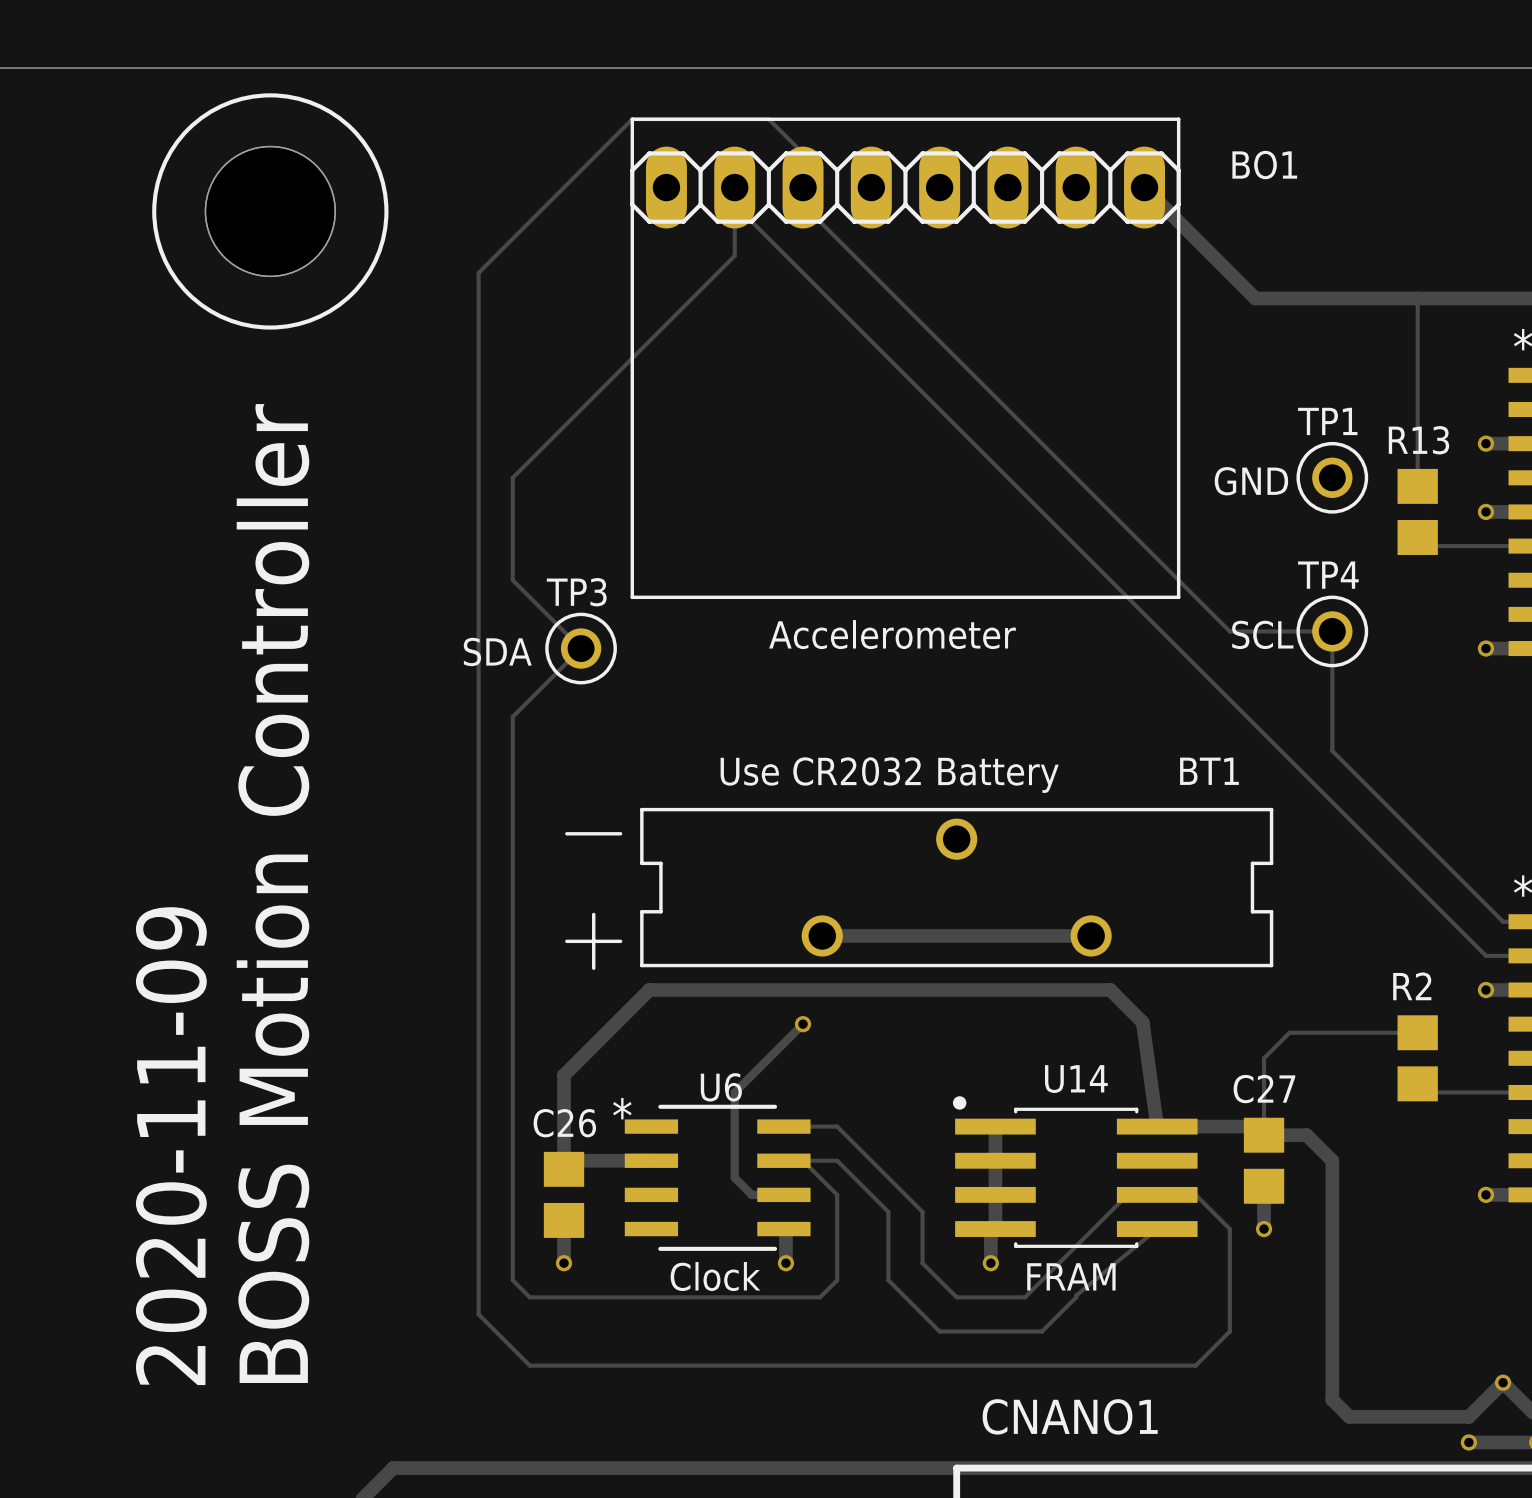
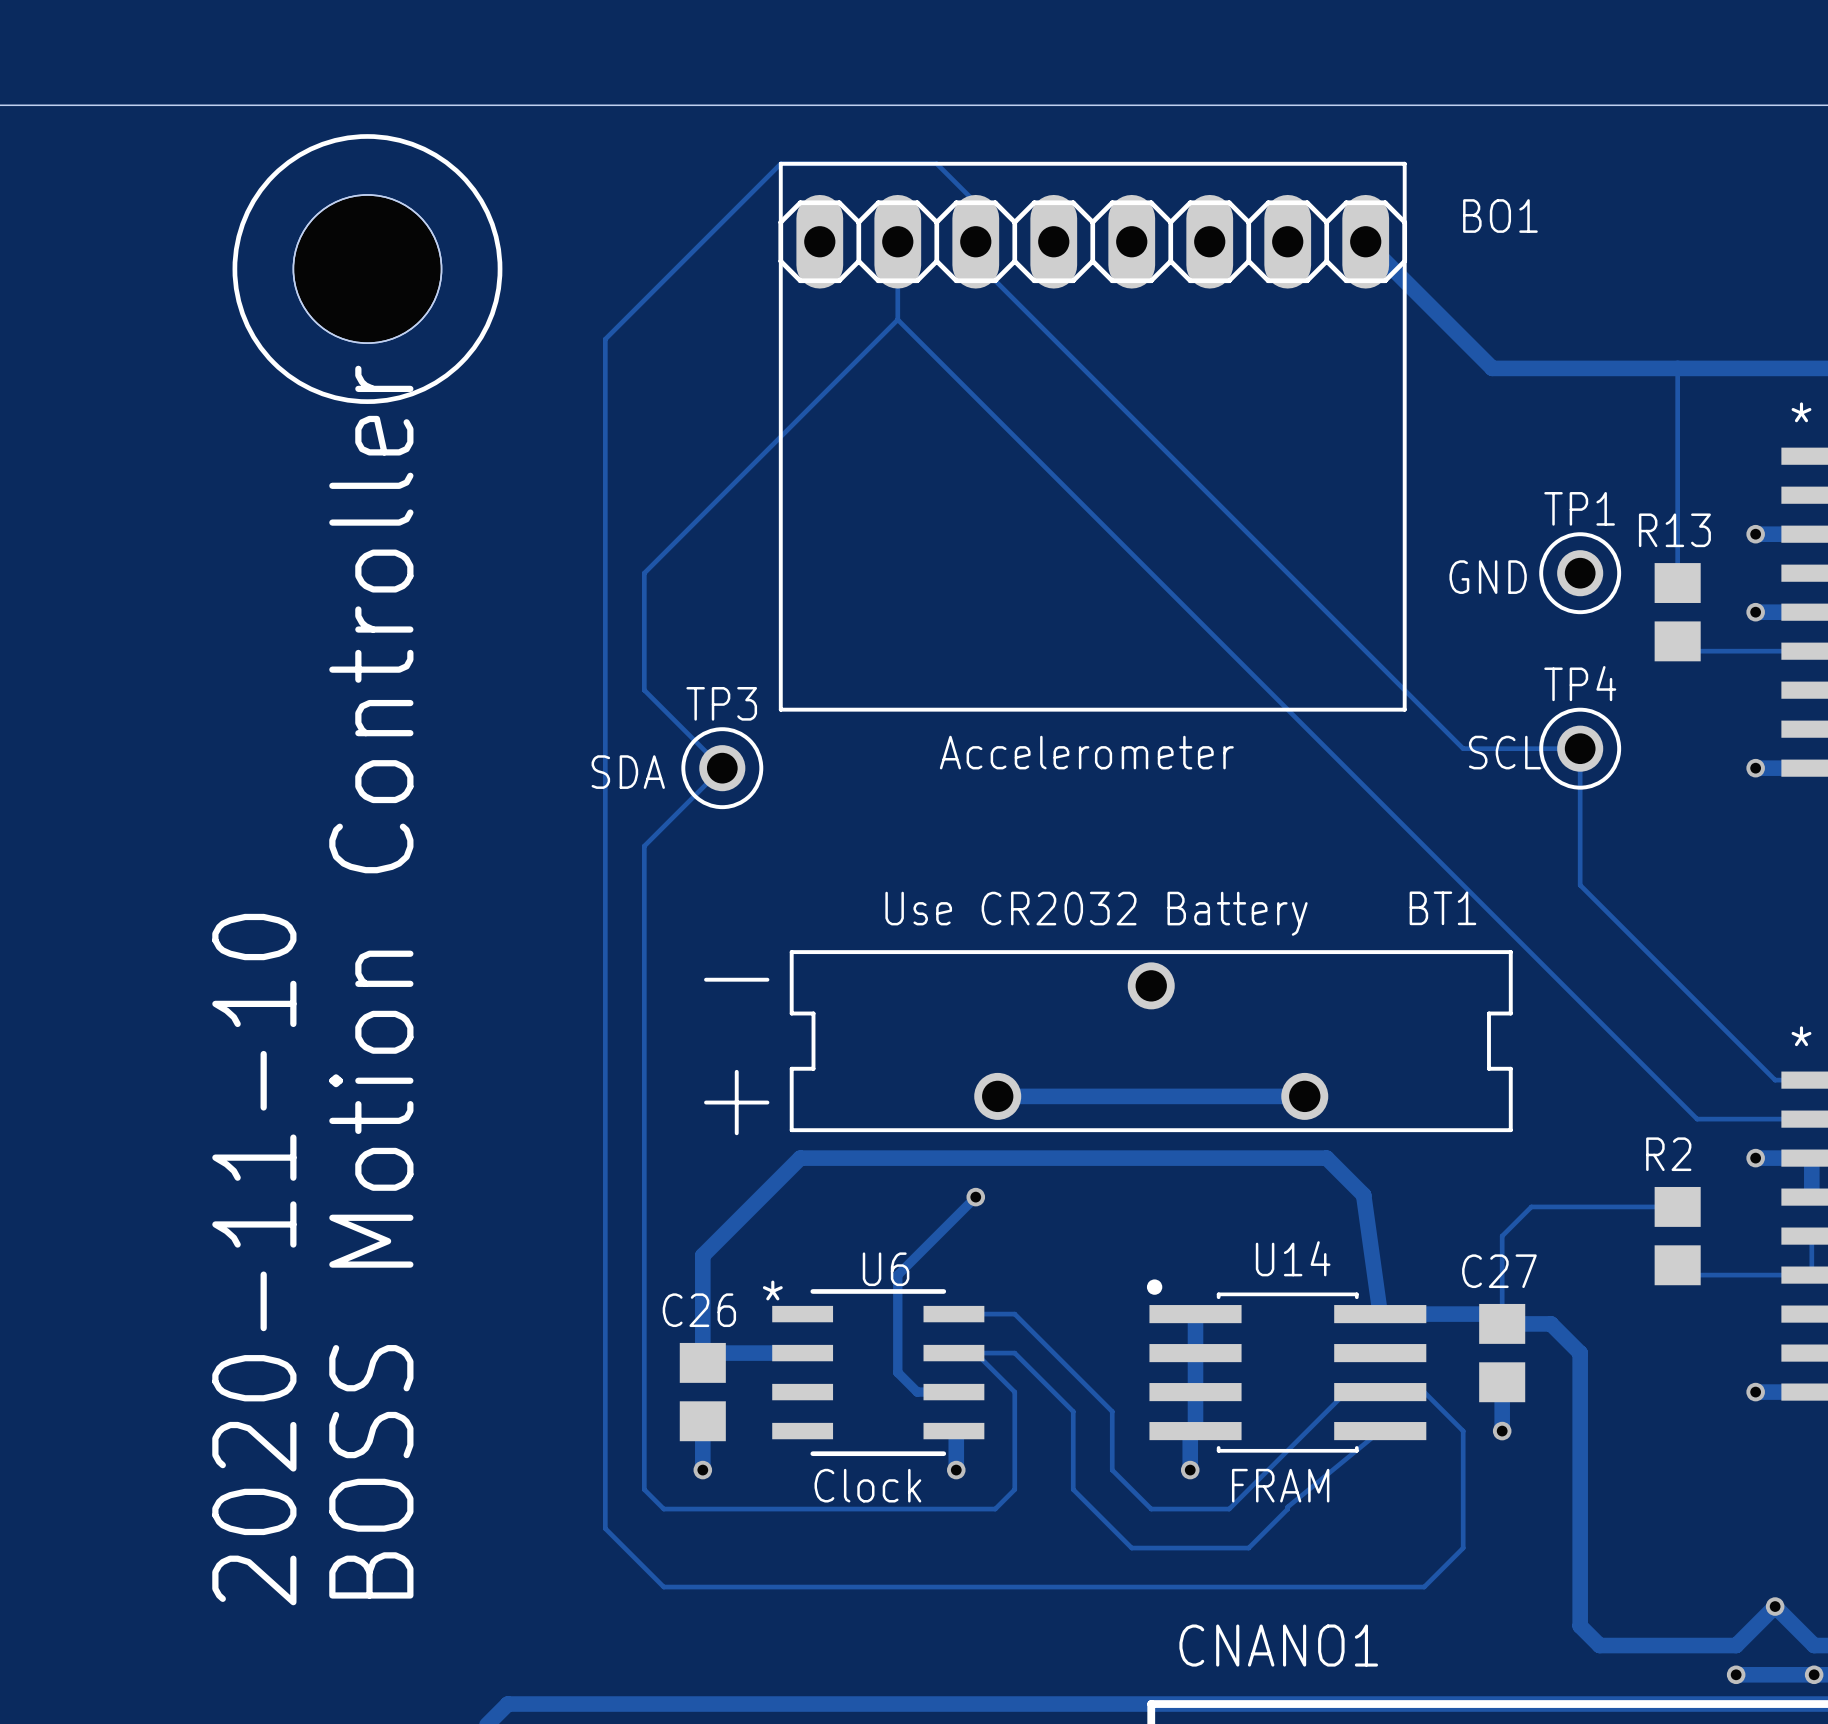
track: (734, 204) (1485, 955) -> (897, 319) (1697, 1119) (1755, 1119)
text: 2020-11-09 (171, 1146) -> 2020-11-10 (254, 1259)

